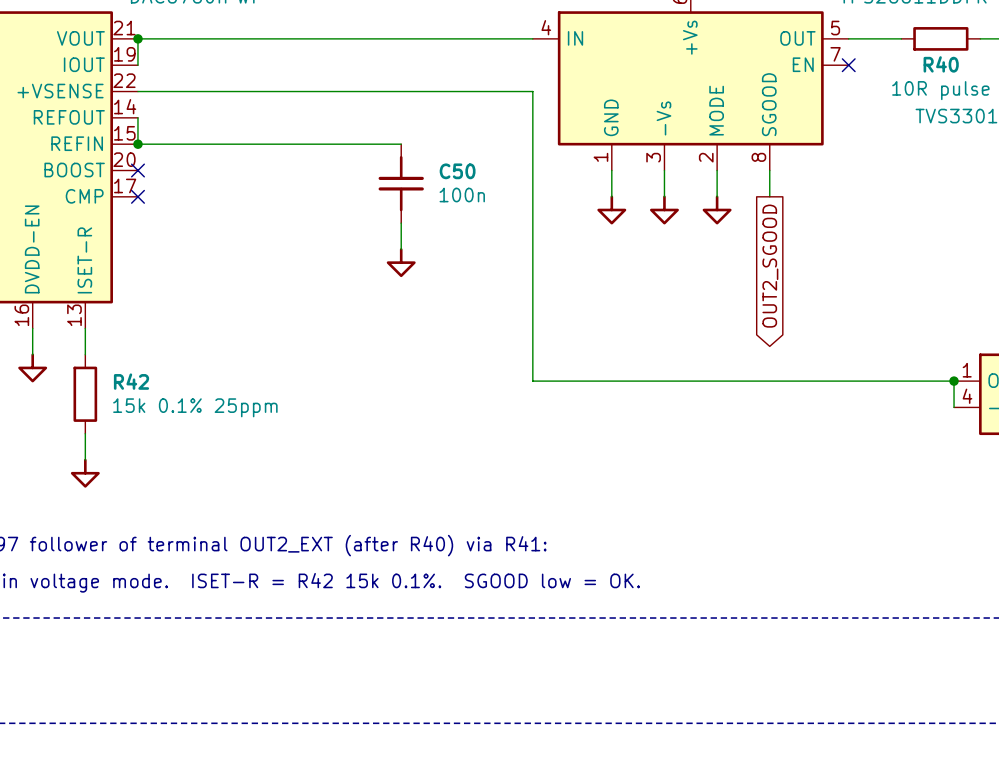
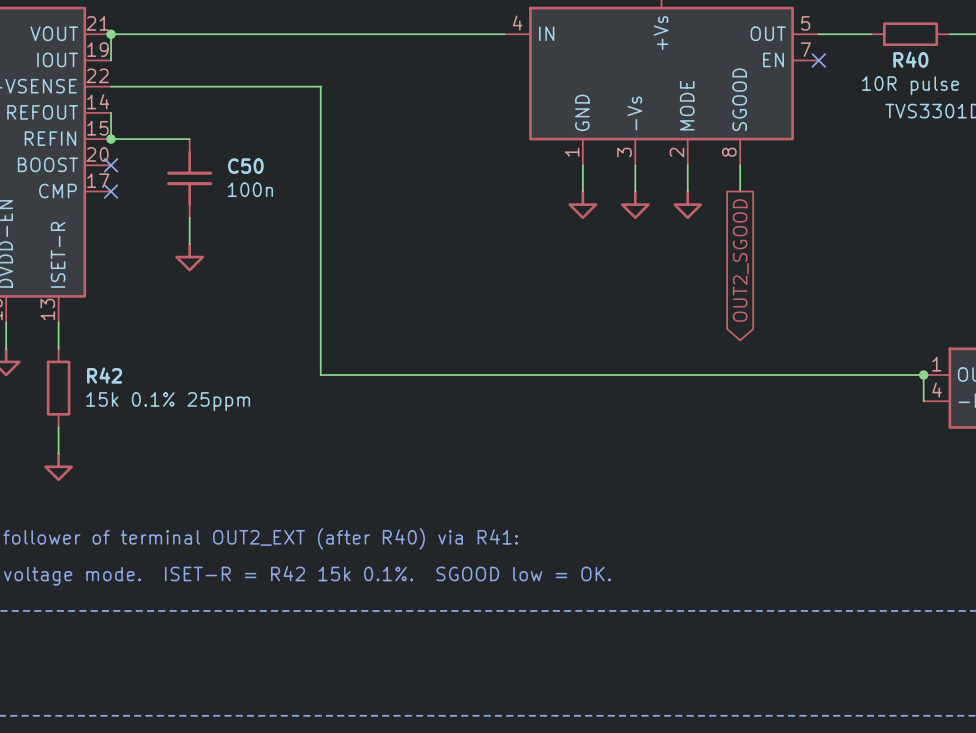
wire: (348, 91) (532, 91) (532, 381) -> (320, 86) (320, 375) (504, 375)
wire: (216, 144) (401, 144) -> none
C50 position: (401, 183) -> (189, 178)
wire: (401, 223) (401, 249) -> (189, 217) (189, 243)
power symbol position: (401, 262) -> (189, 257)

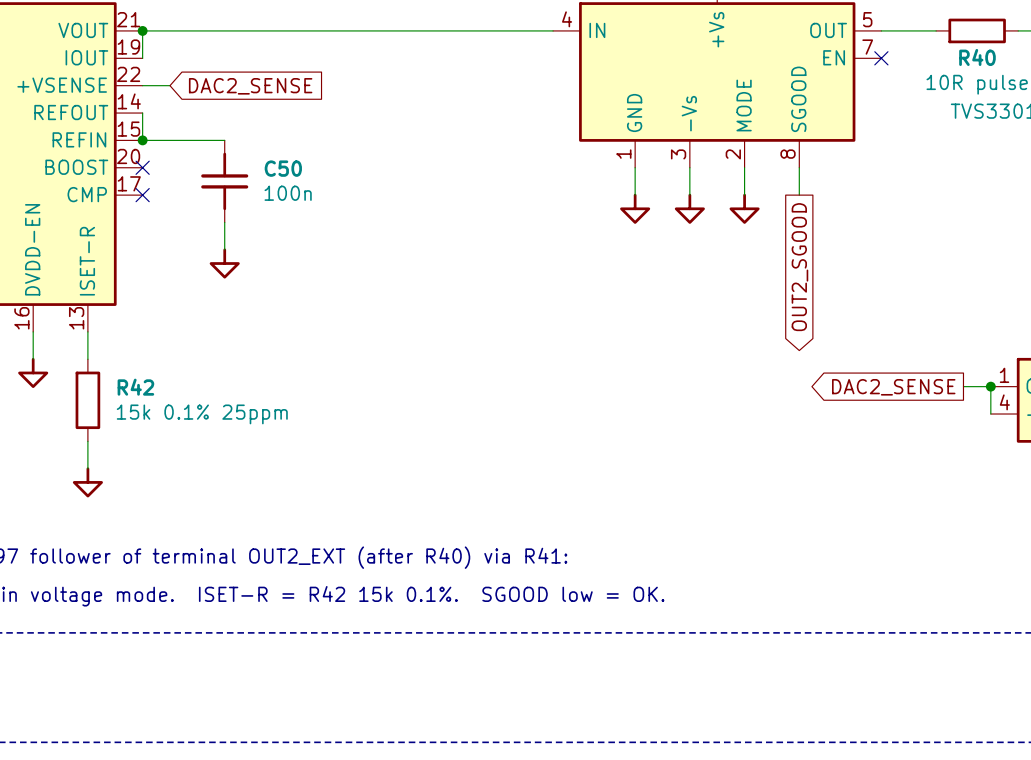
wire: (137, 86) (320, 86) (320, 375) (897, 375) -> none
global label: none -> DAC2_SENSE (250, 86)
global label: none -> DAC2_SENSE (893, 387)

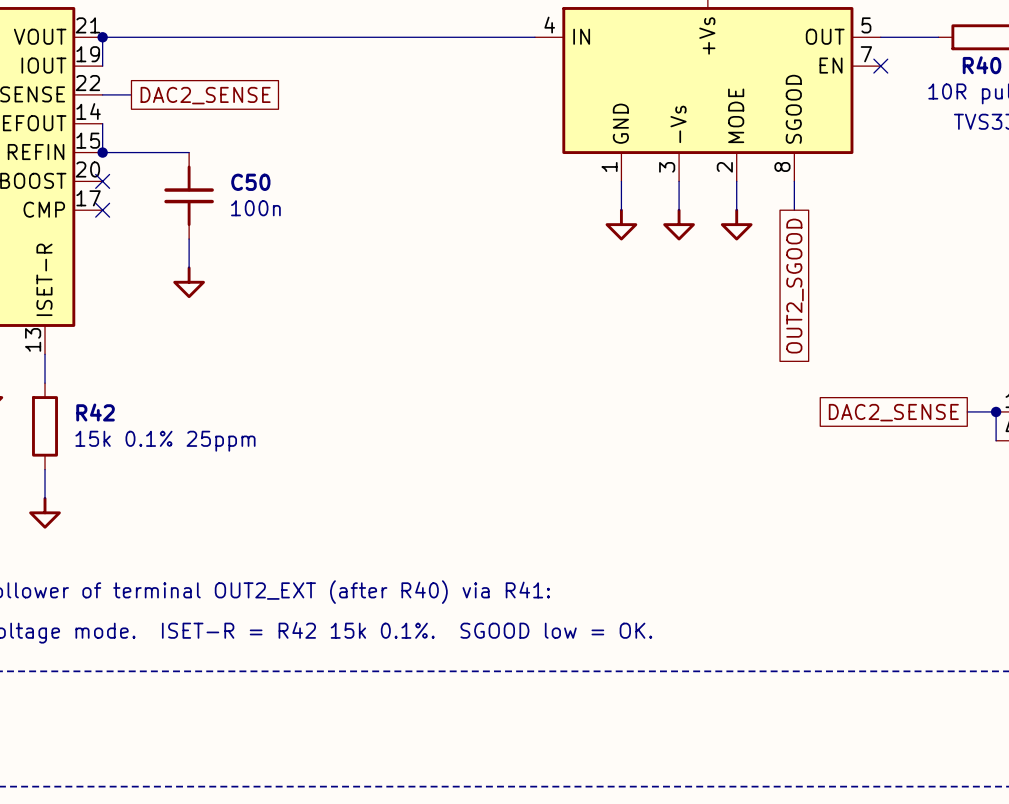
global label shape: input (250, 86) -> passive (205, 95)
global label shape: output (799, 267) -> passive (795, 286)
global label shape: output (893, 387) -> passive (893, 412)

